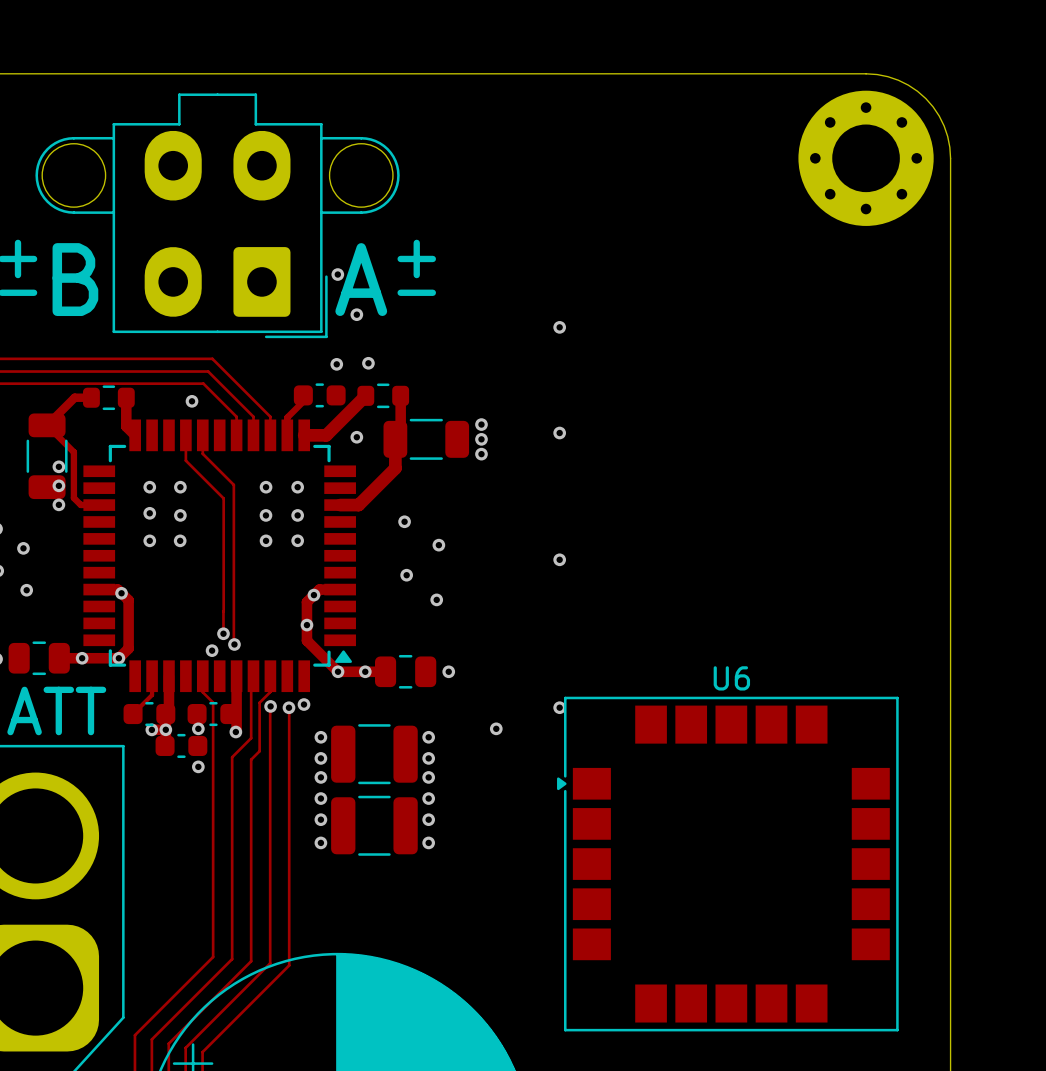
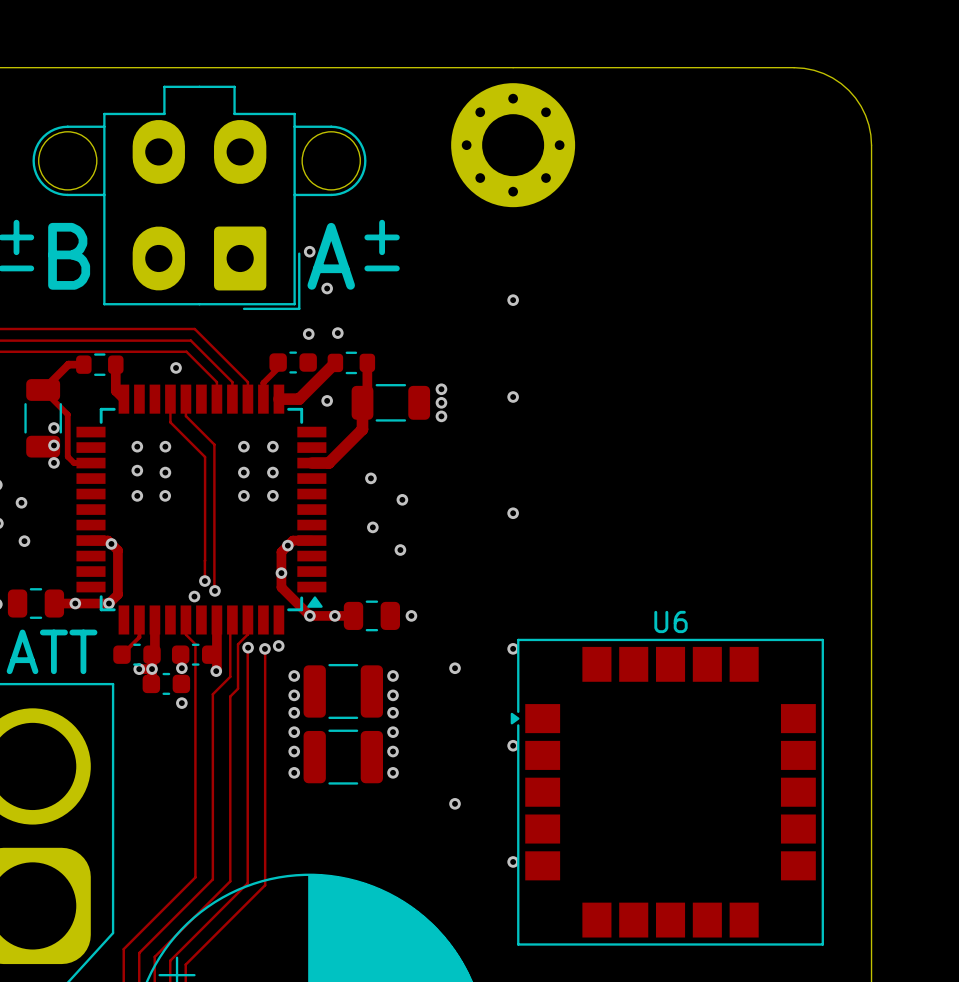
part position: (866, 158) -> (513, 145)
via: none -> (513, 745)
via: none -> (455, 803)
via: none -> (513, 861)

